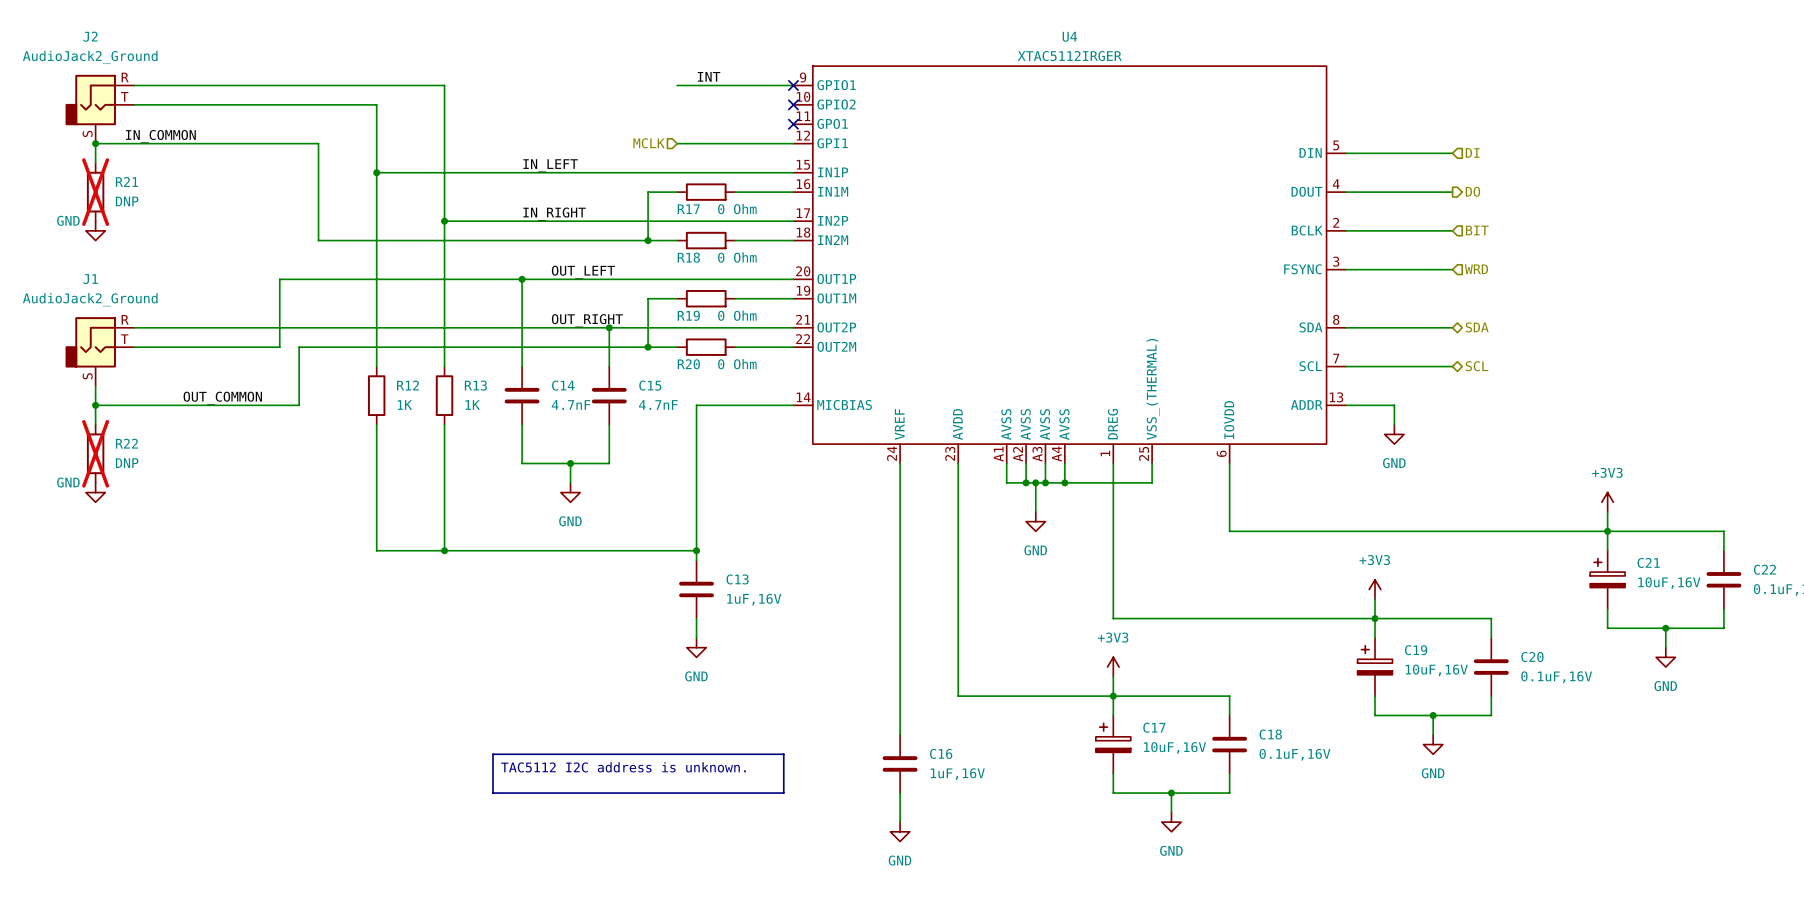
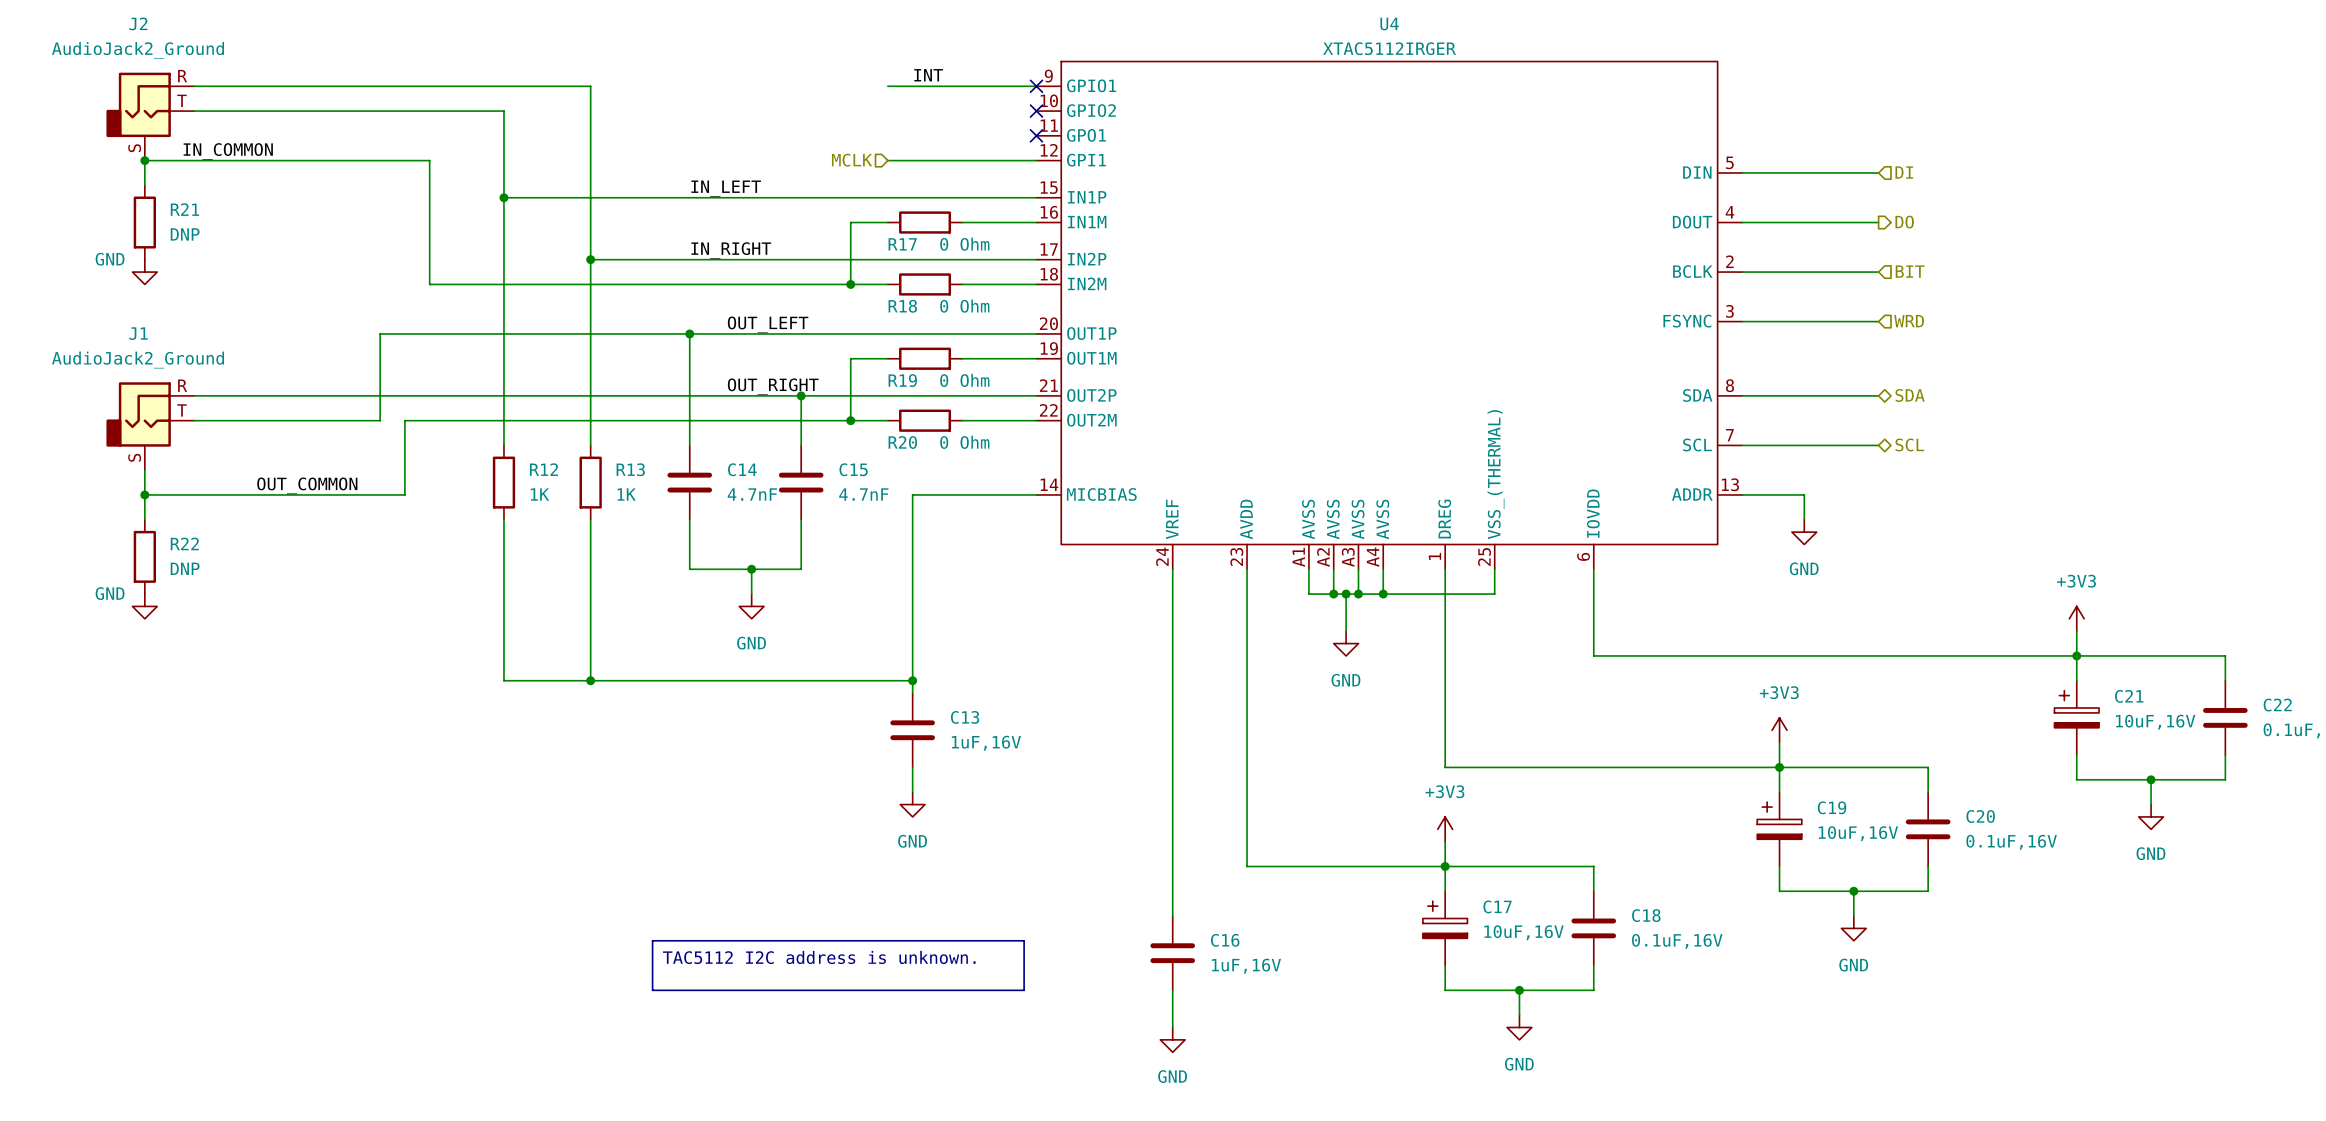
R21 do-not-place cross: (95, 192) -> none
R22 do-not-place cross: (95, 453) -> none

